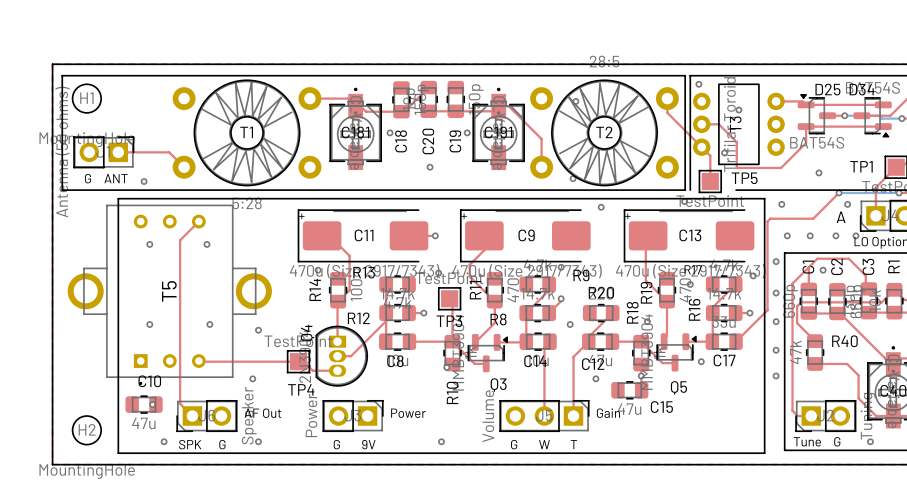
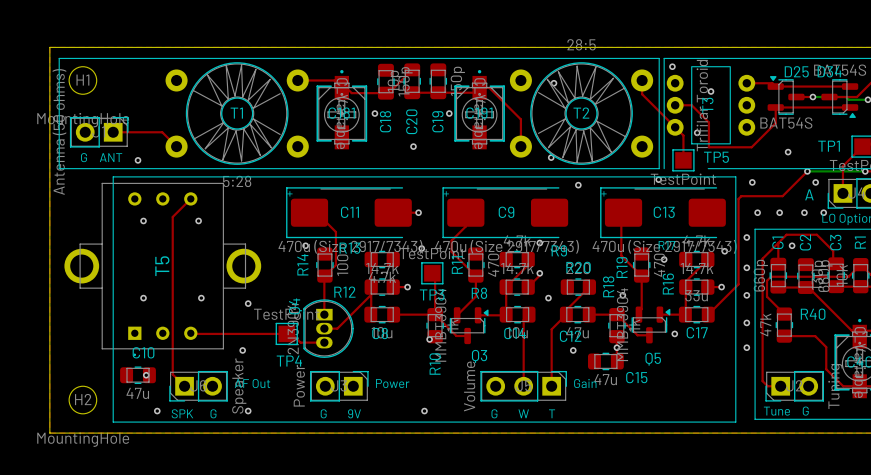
via: (870, 441) -> none

